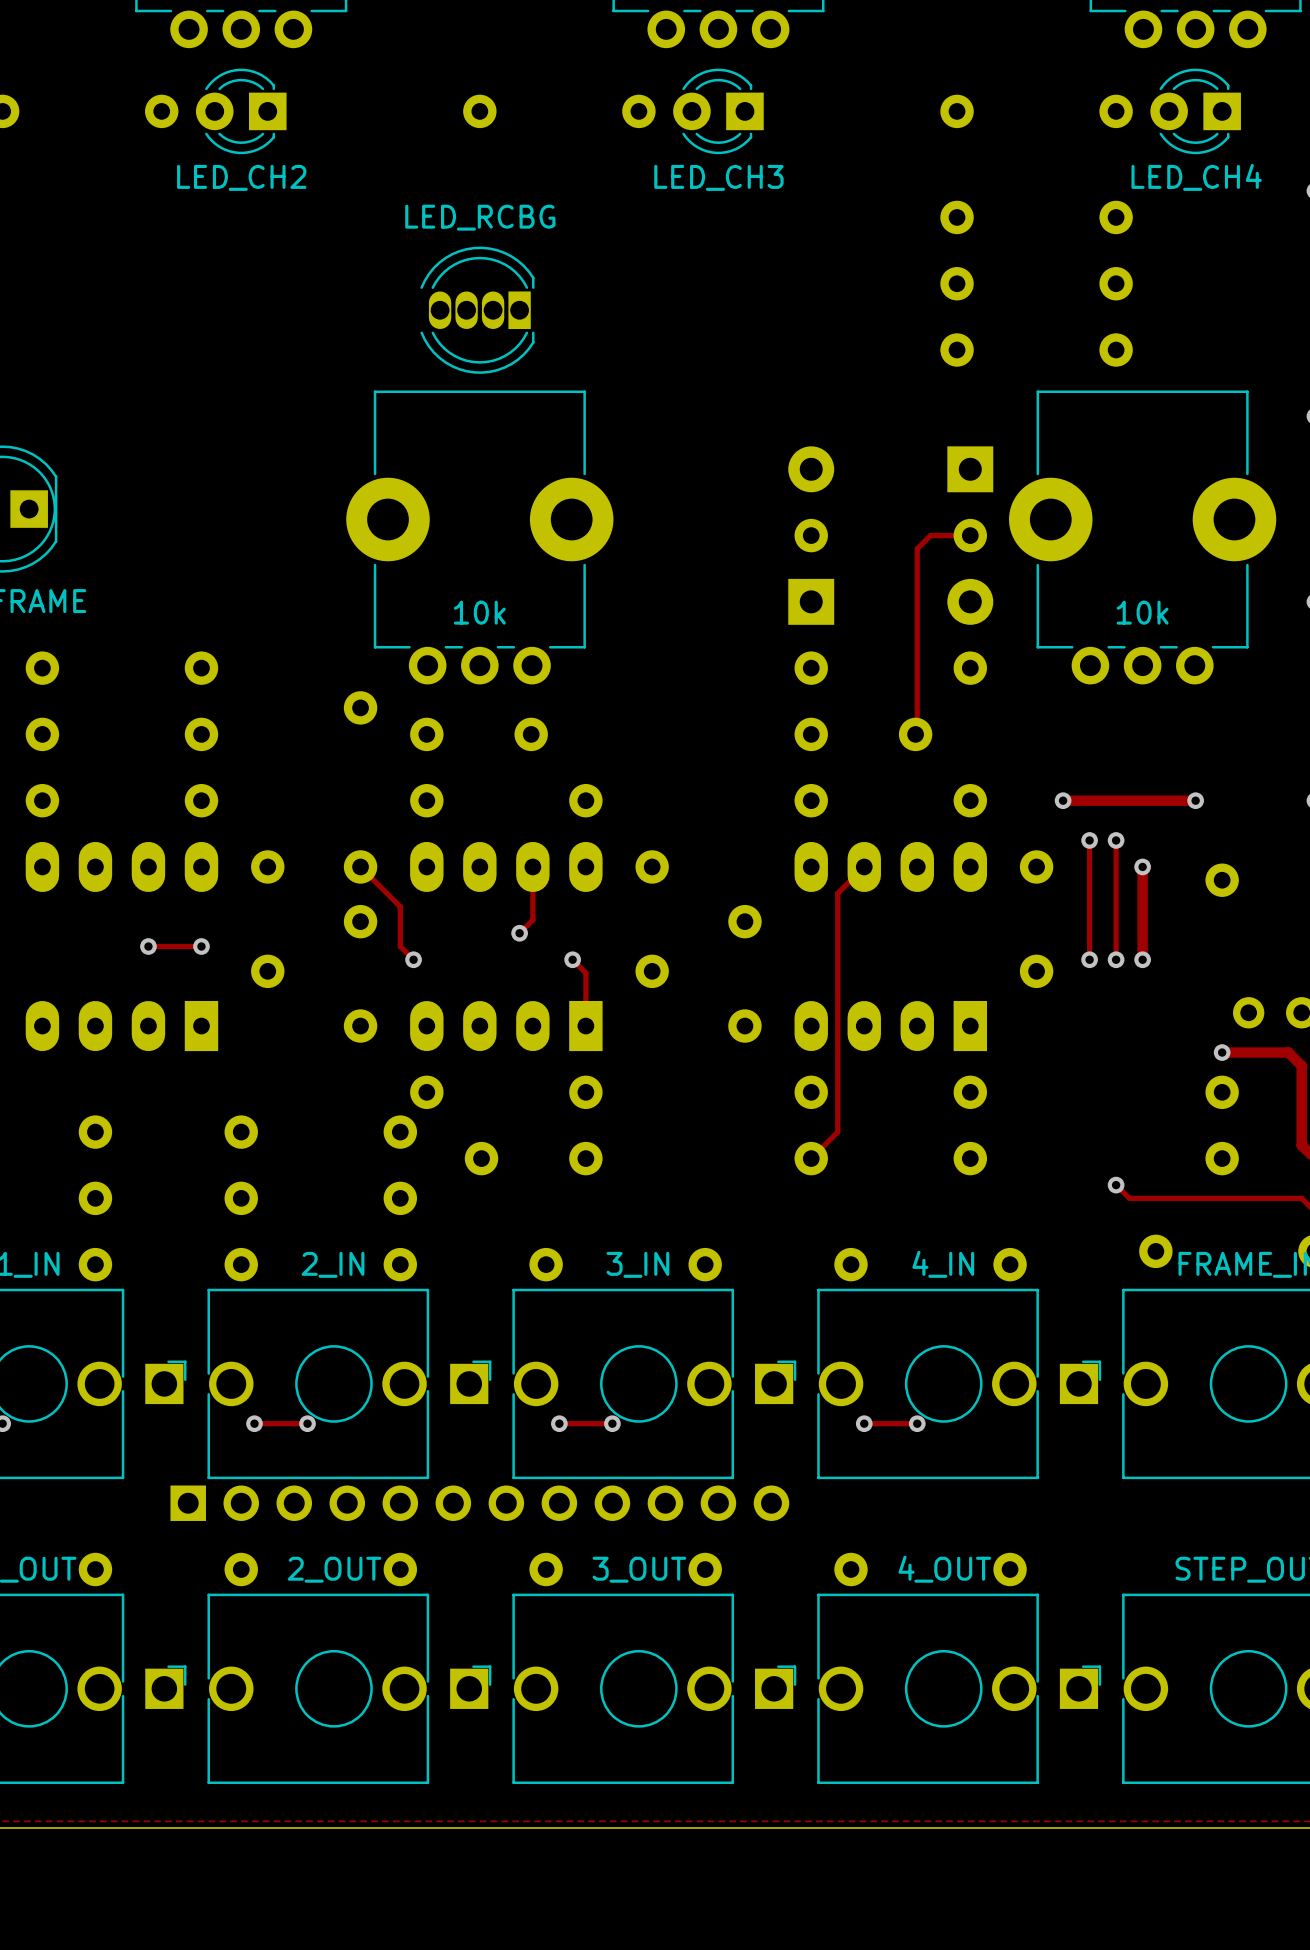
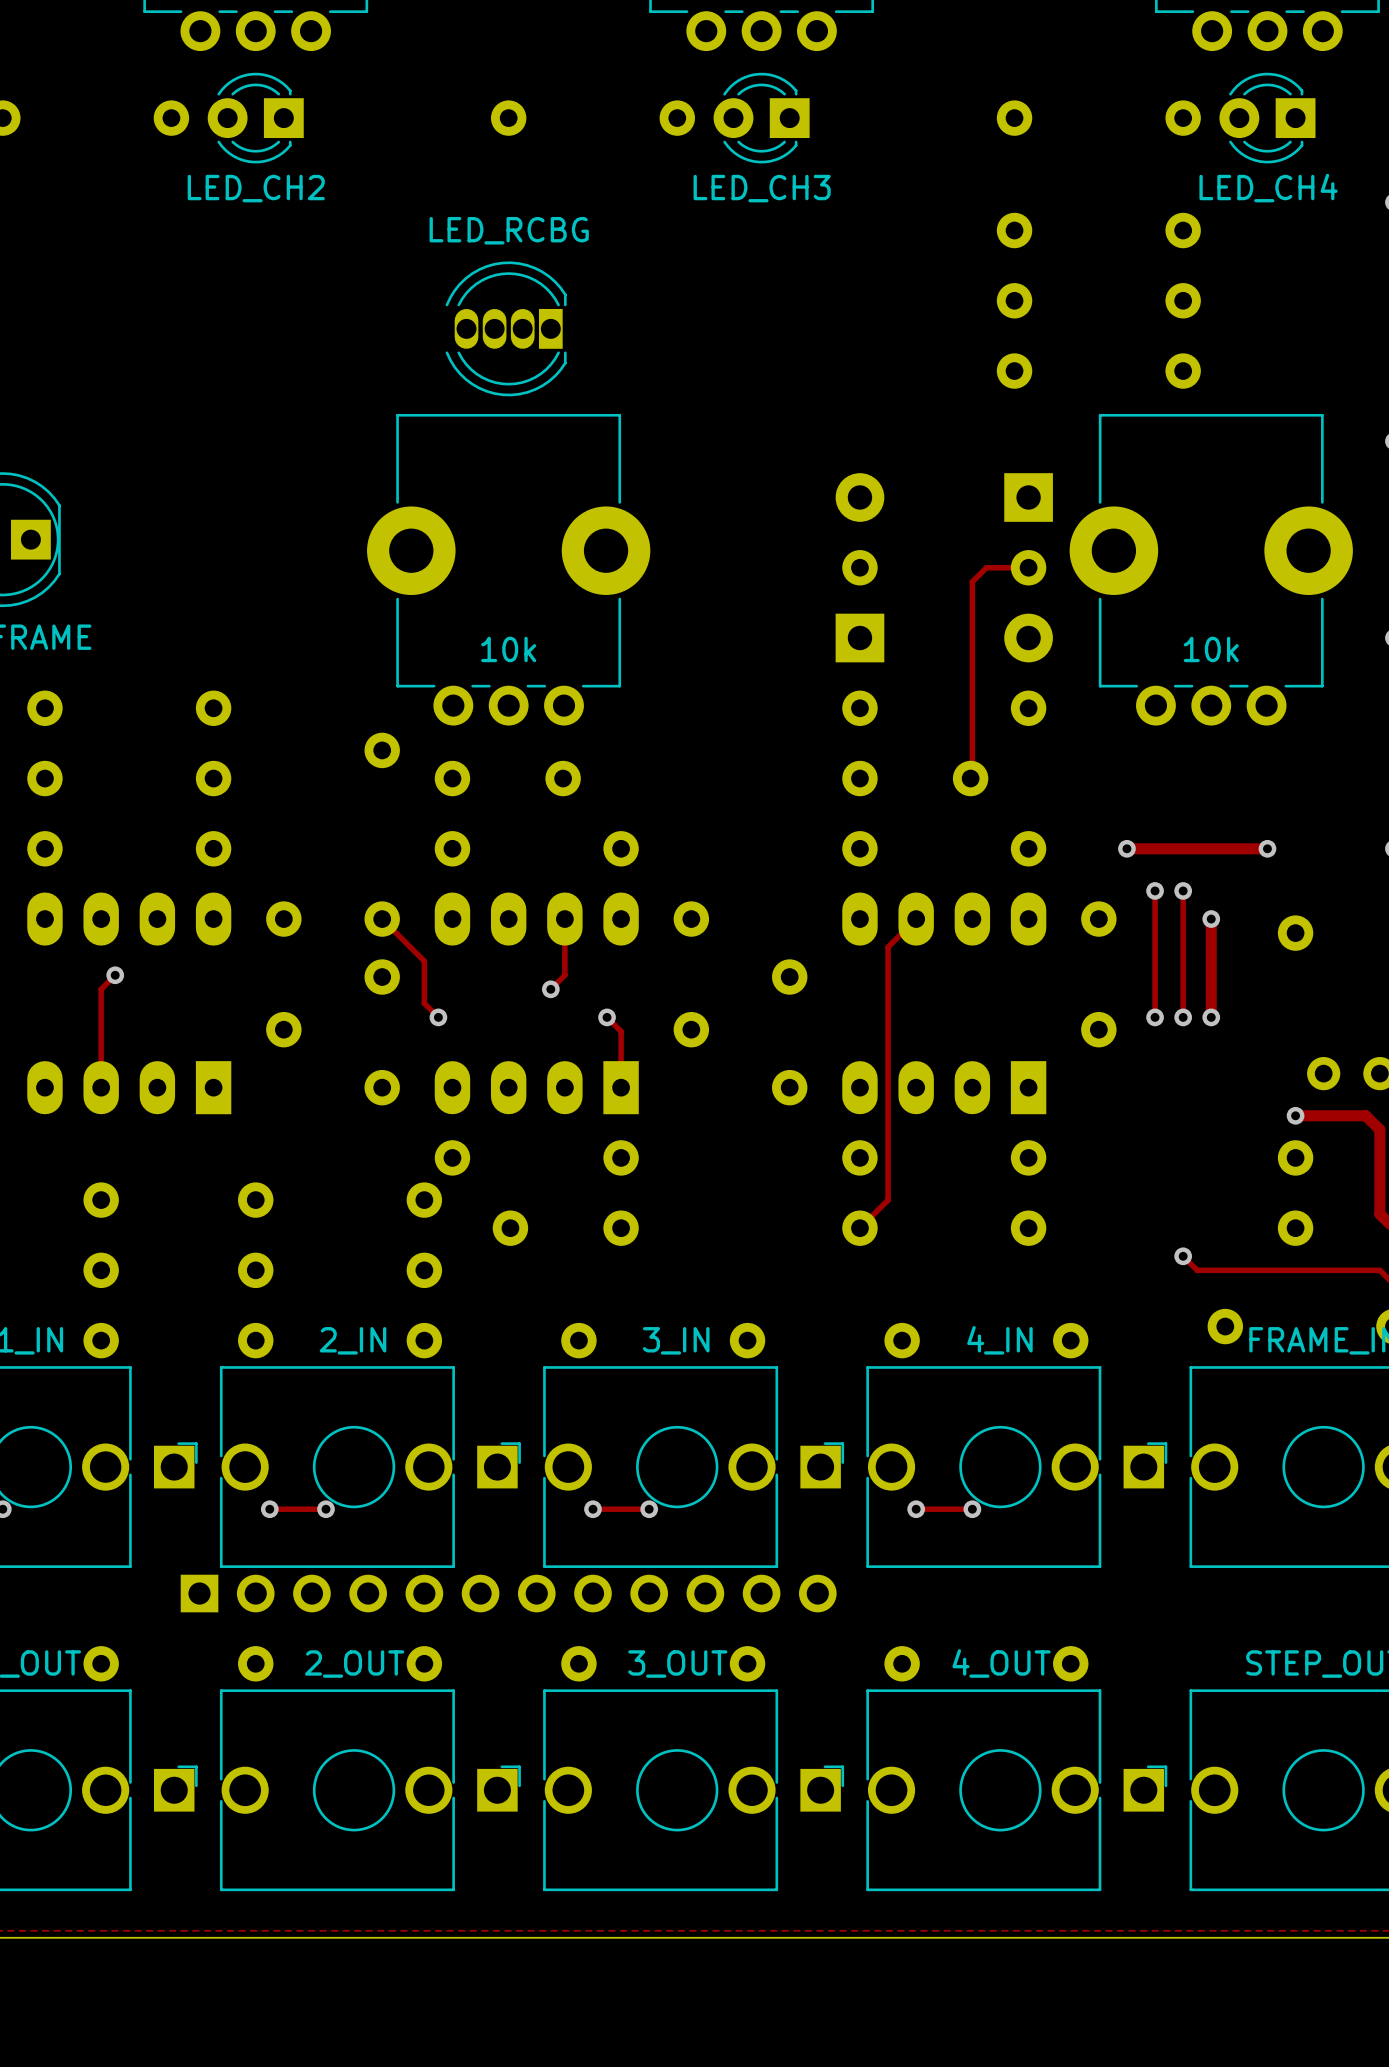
track: none -> (115, 975) (101, 989) (101, 1087)
track: (148, 946) (201, 946) -> none
via position: (148, 946) -> (115, 975)
via: (201, 946) -> none

